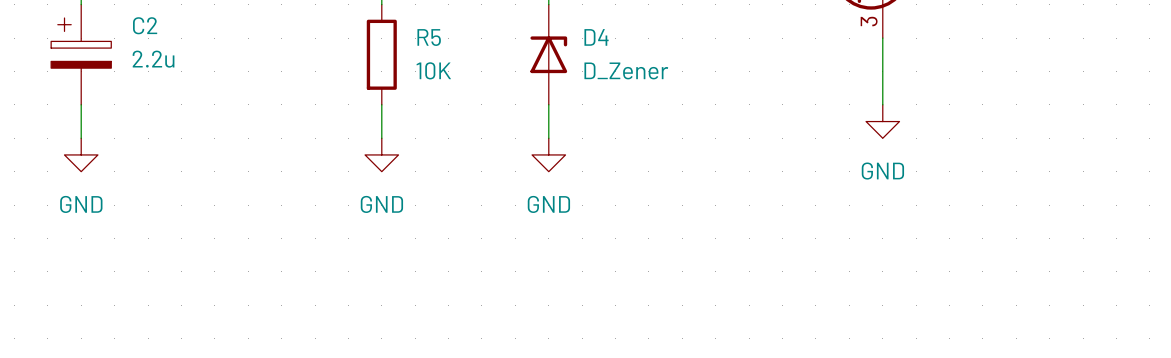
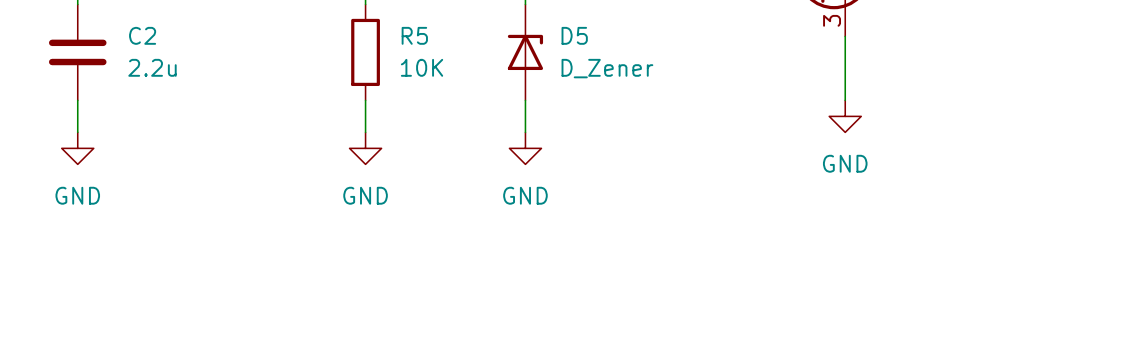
C2 symbol: [51, 4, 112, 105] -> [48, 4, 107, 101]
D4 name: D4 (596, 37) -> D5 (574, 35)

